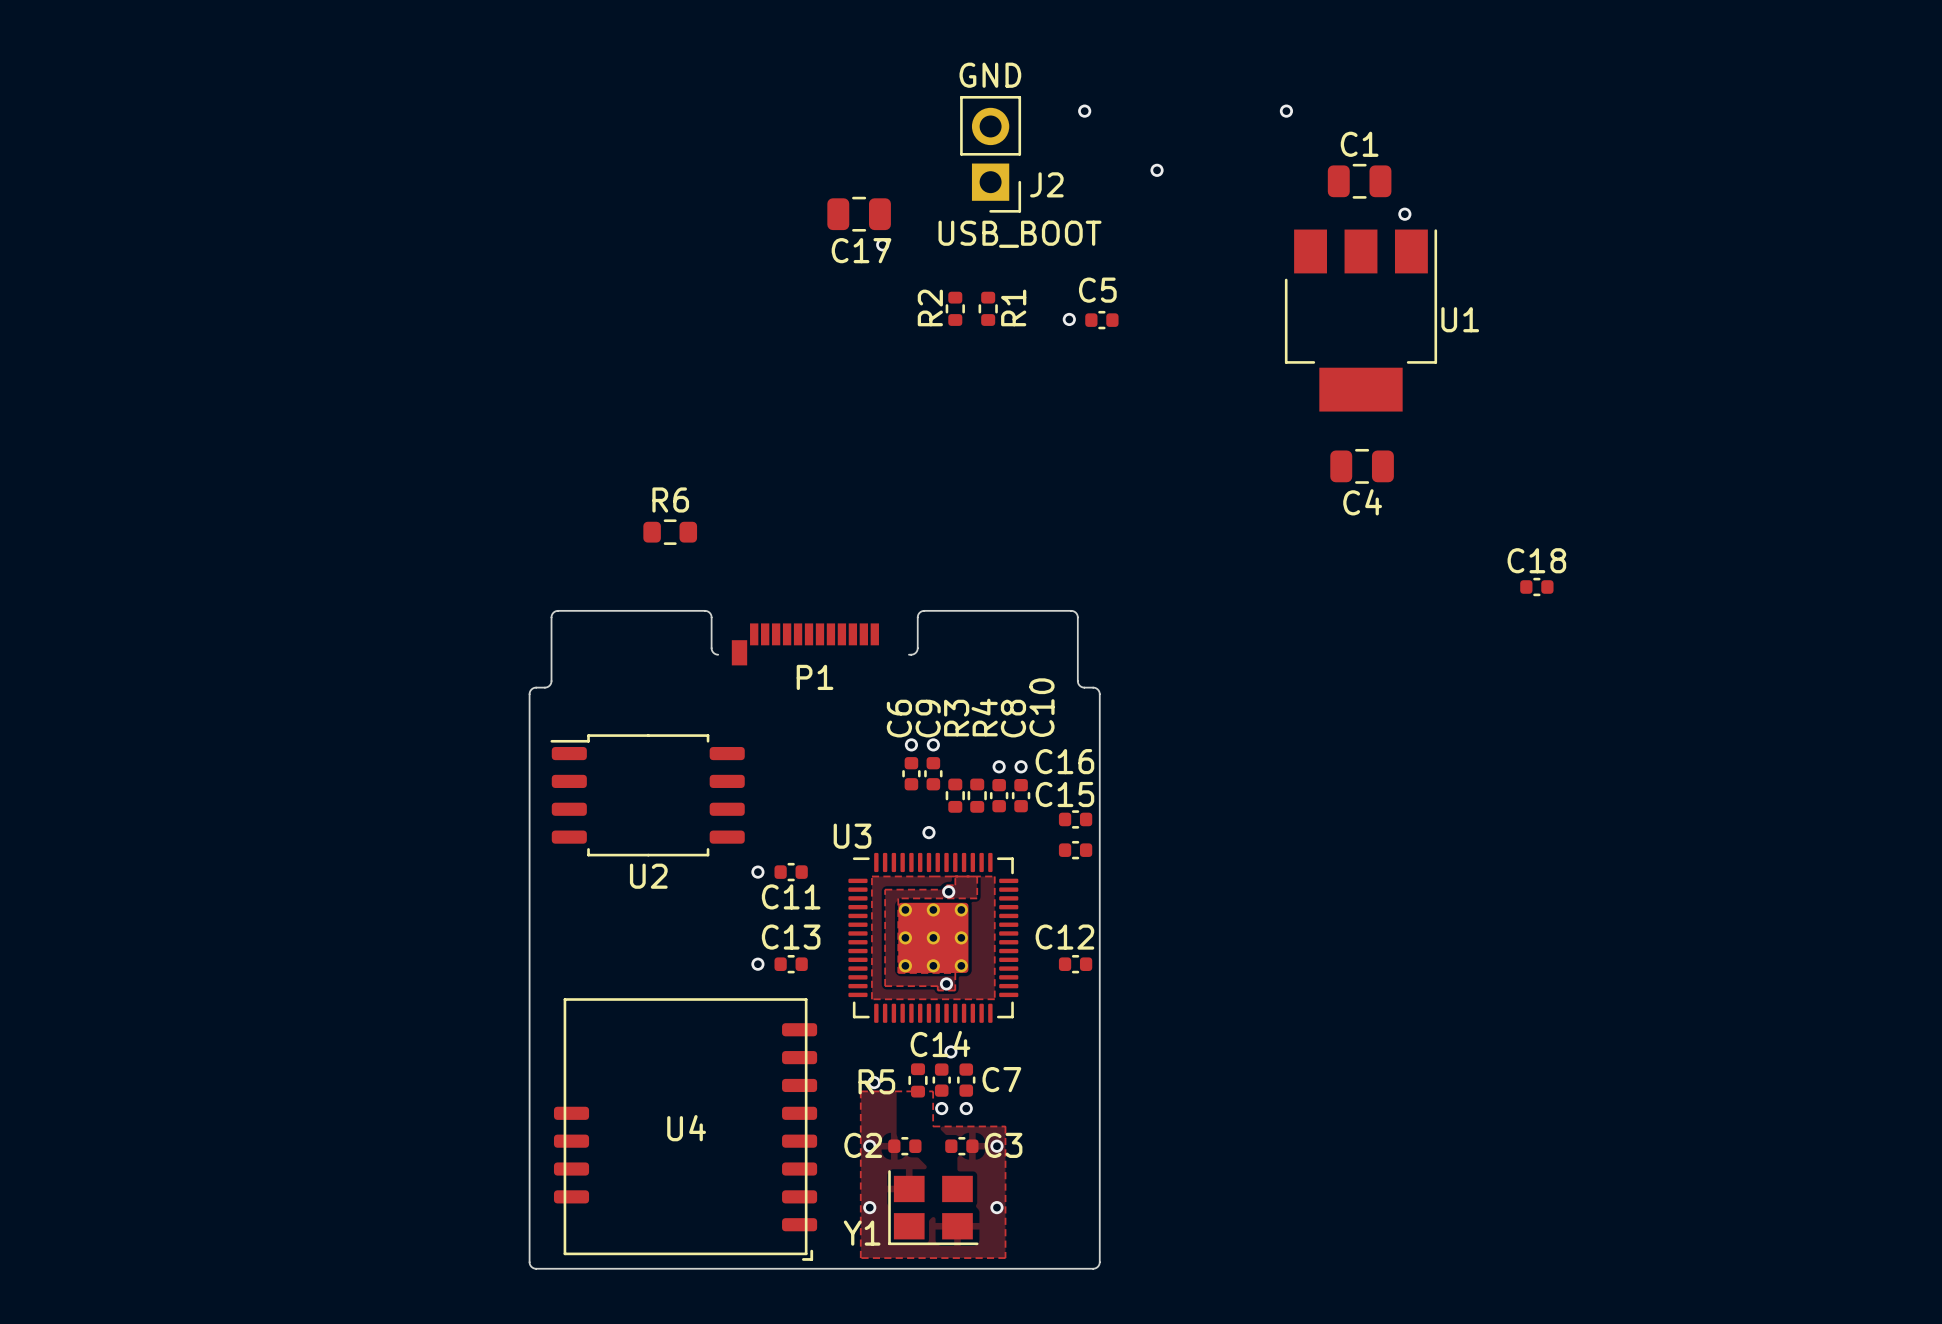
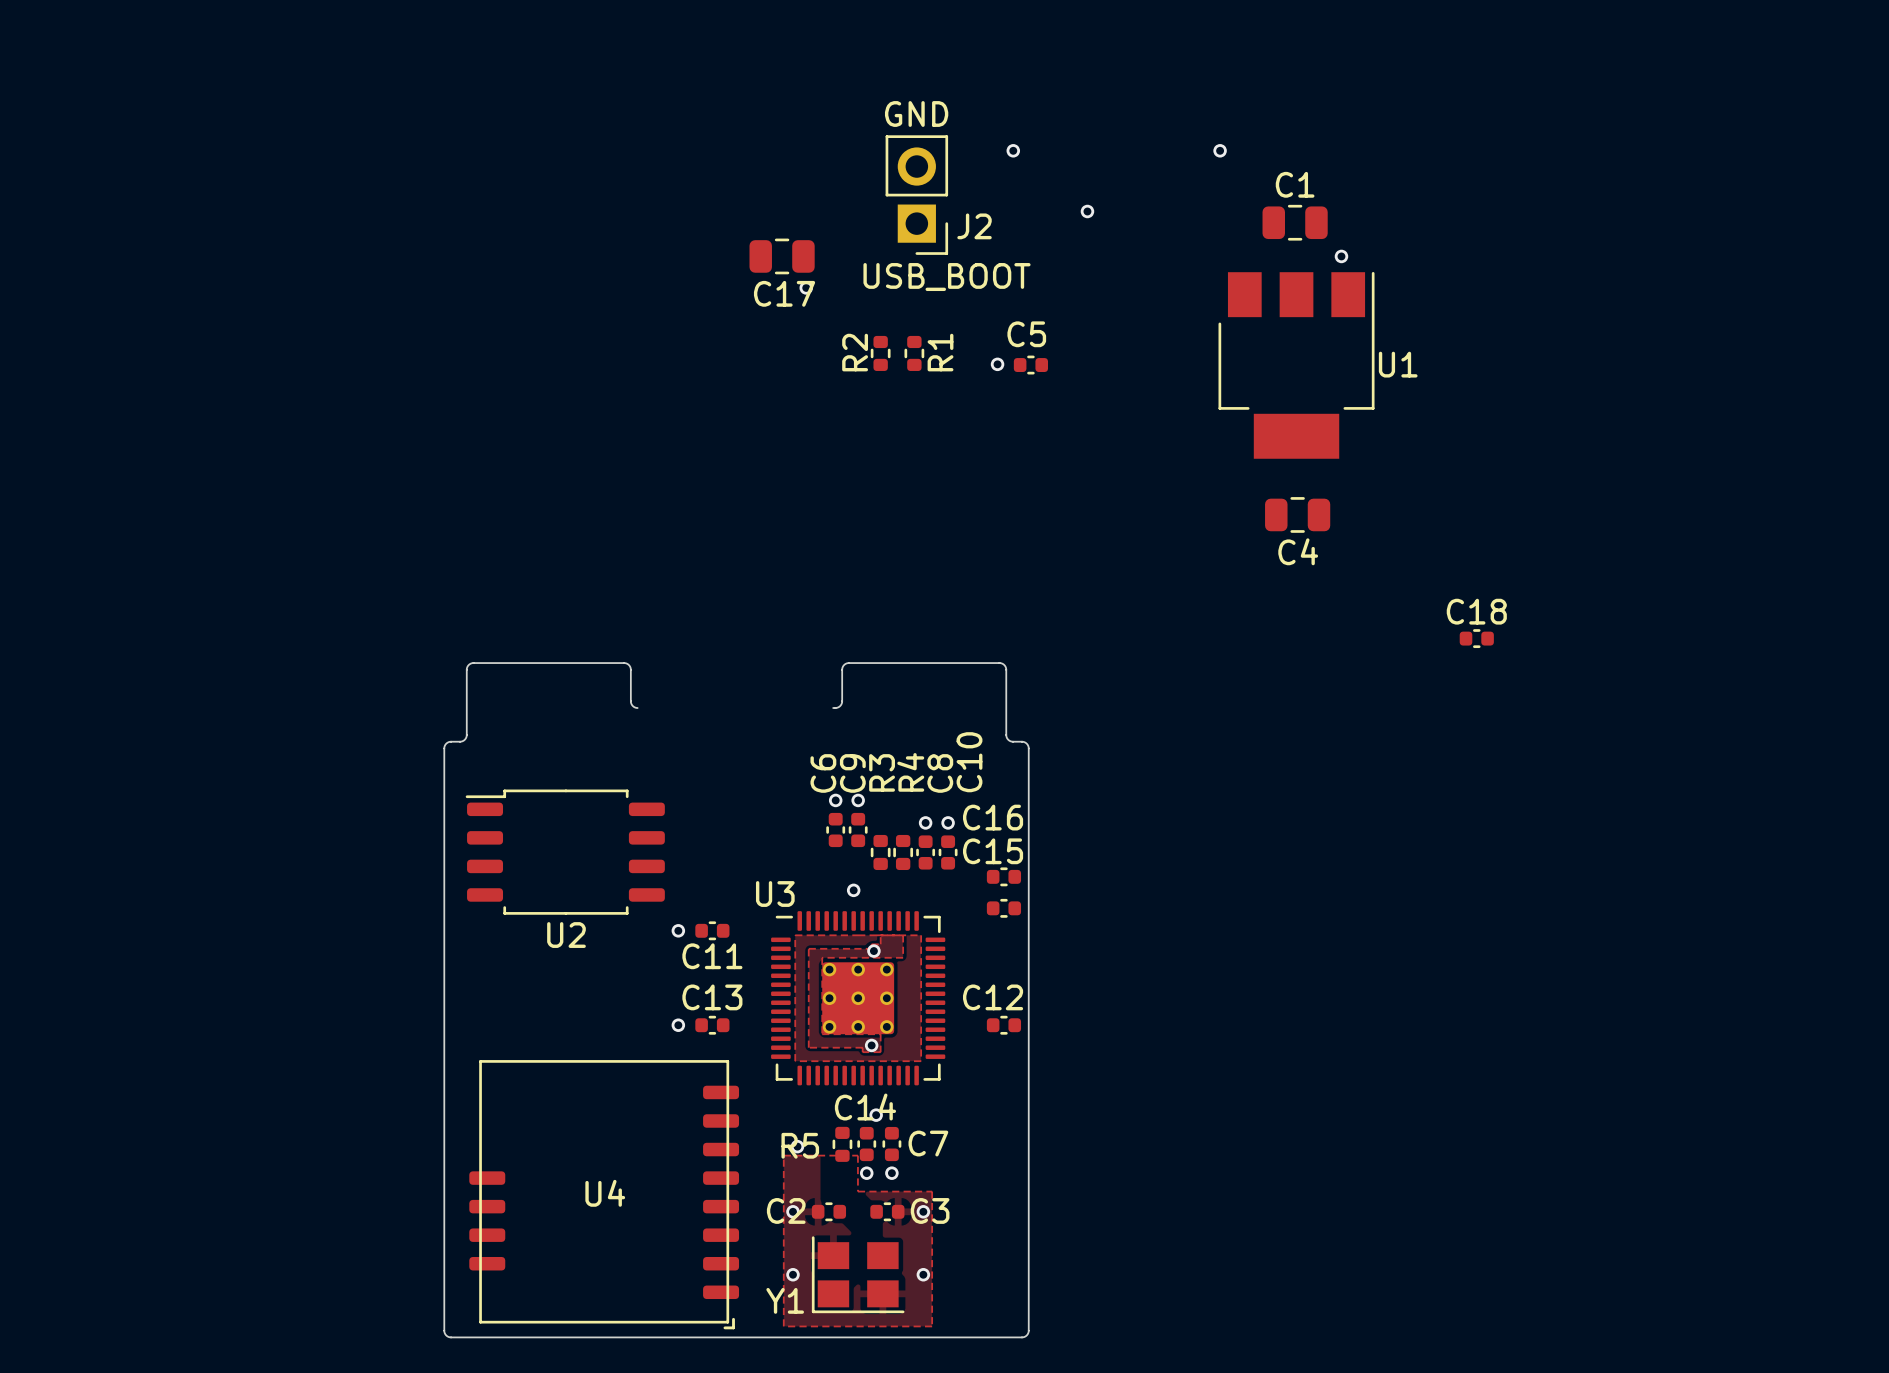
R6: (670, 532) -> none
P1: (805, 644) -> none

